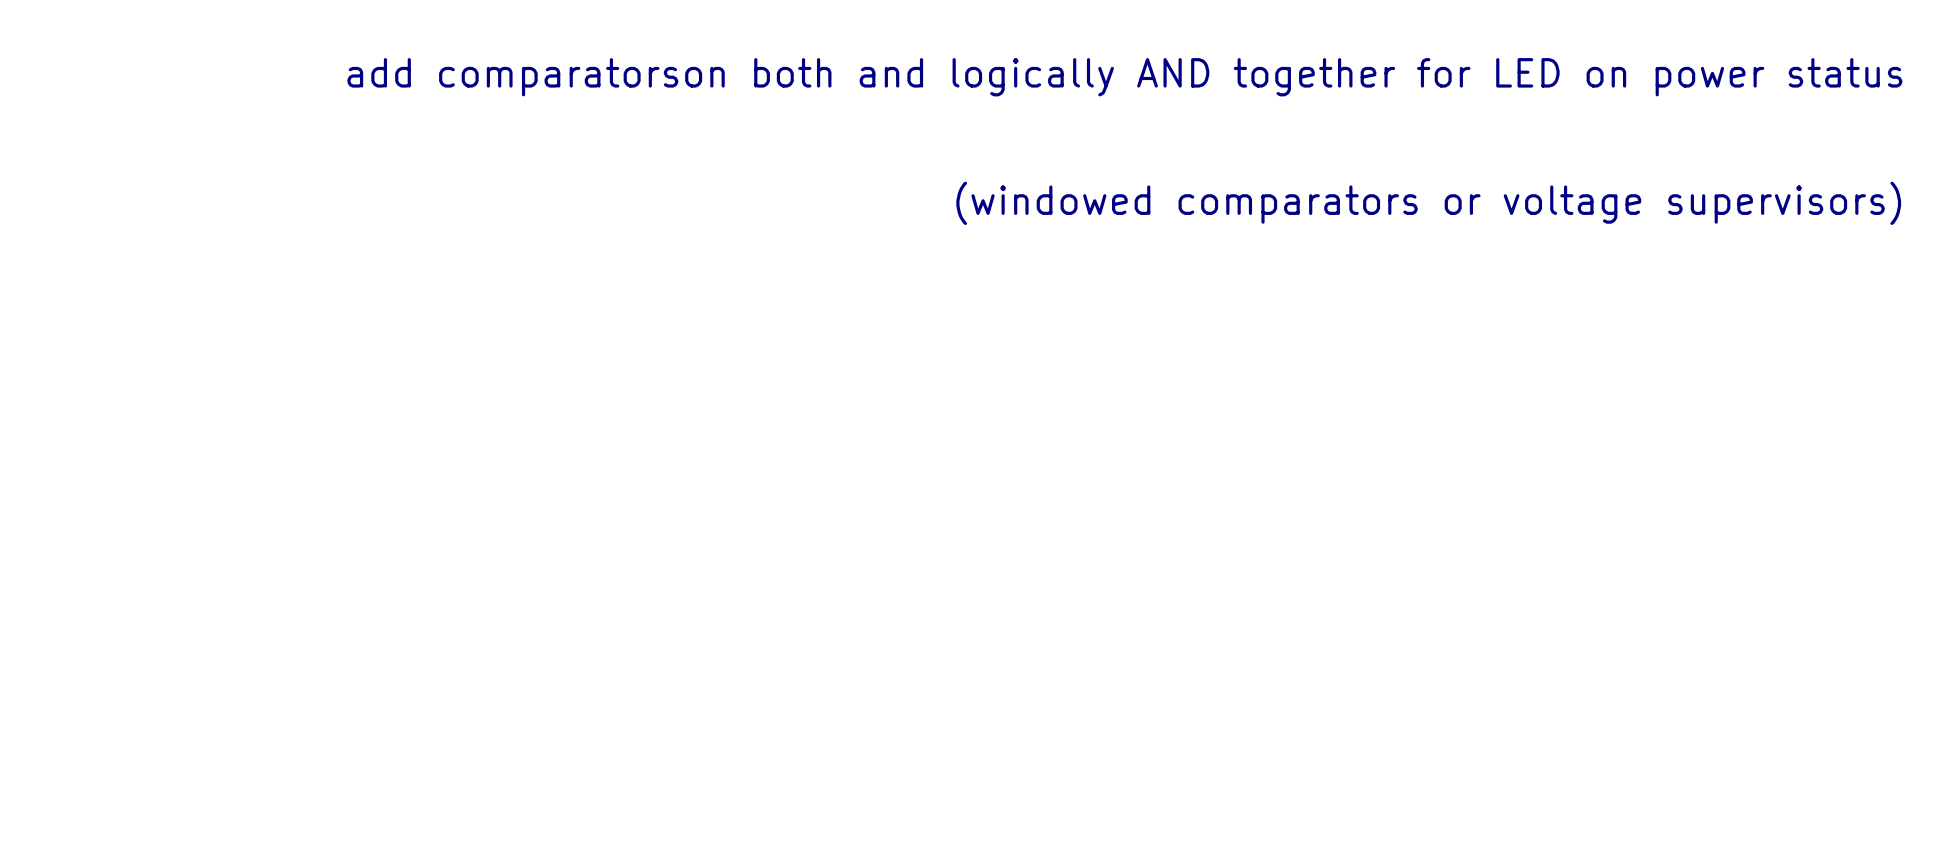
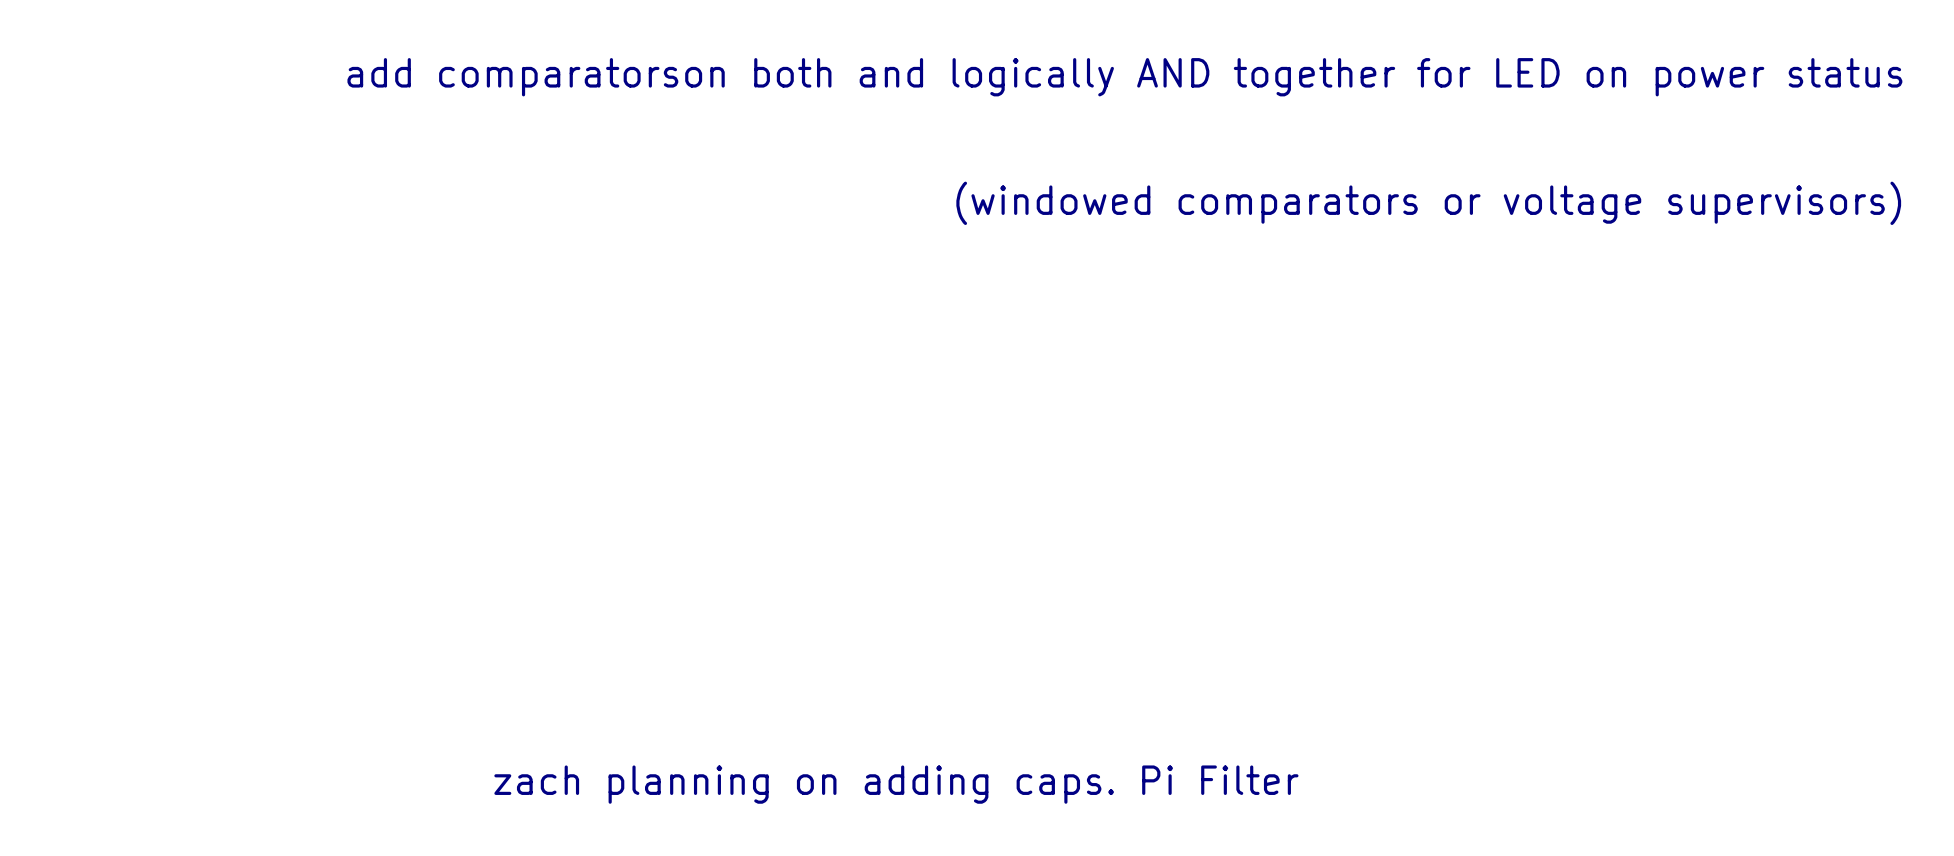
text: none -> zach planning on adding caps. Pi Filter (896, 784)

